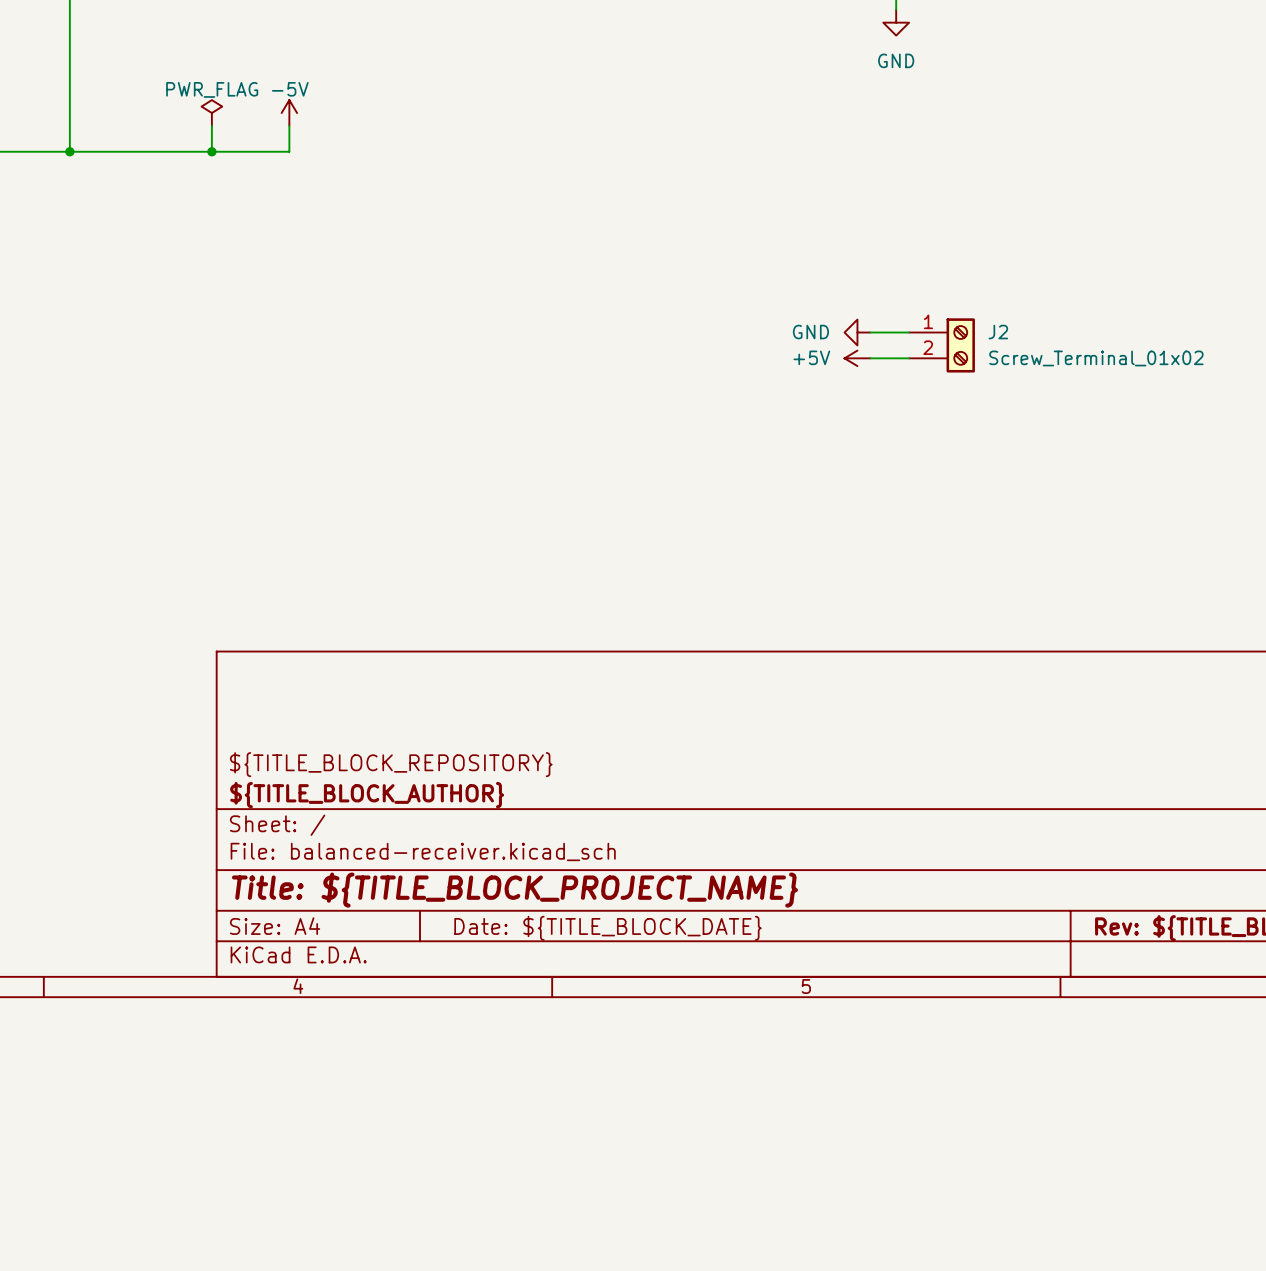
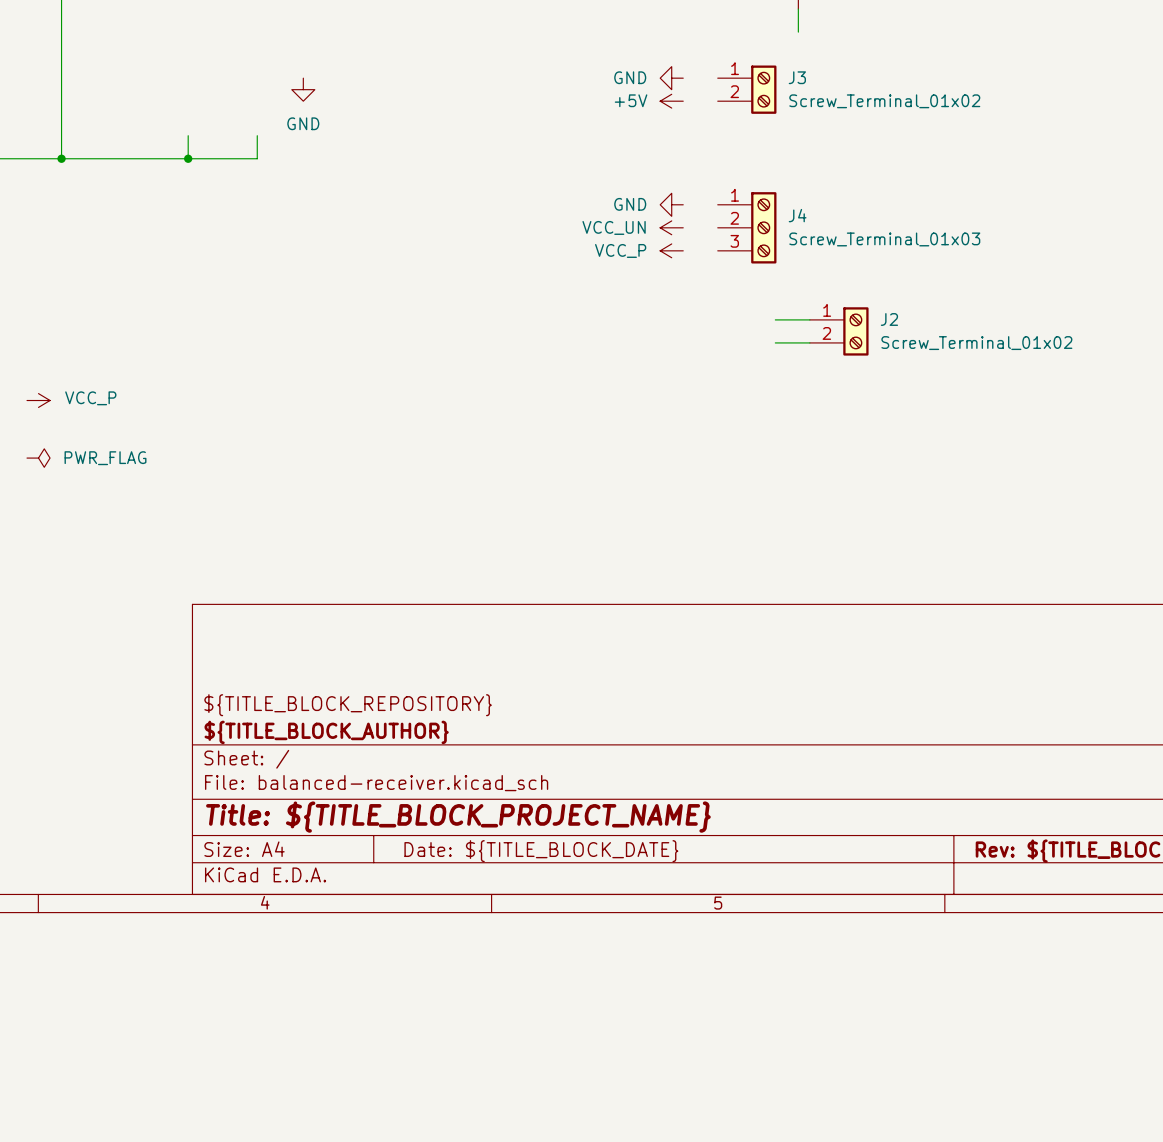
power symbol: GND (896, 22) -> none
power symbol: none -> GND (671, 78)
power symbol: none -> GND (303, 89)
J3: none -> Screw_Terminal_01x02 (747, 89)
power symbol: none -> +5V (671, 101)
power symbol: PWR_FLAG (211, 113) -> none
power symbol: -5V (289, 113) -> none
power symbol: none -> GND (671, 204)
power symbol: none -> VCC_UN (671, 227)
J4: none -> Screw_Terminal_01x03 (747, 227)
power symbol: none -> VCC_P (671, 250)
power symbol: GND (857, 332) -> none
power symbol: +5V (857, 358) -> none
power symbol: none -> VCC_P (38, 400)
power symbol: none -> PWR_FLAG (38, 458)

